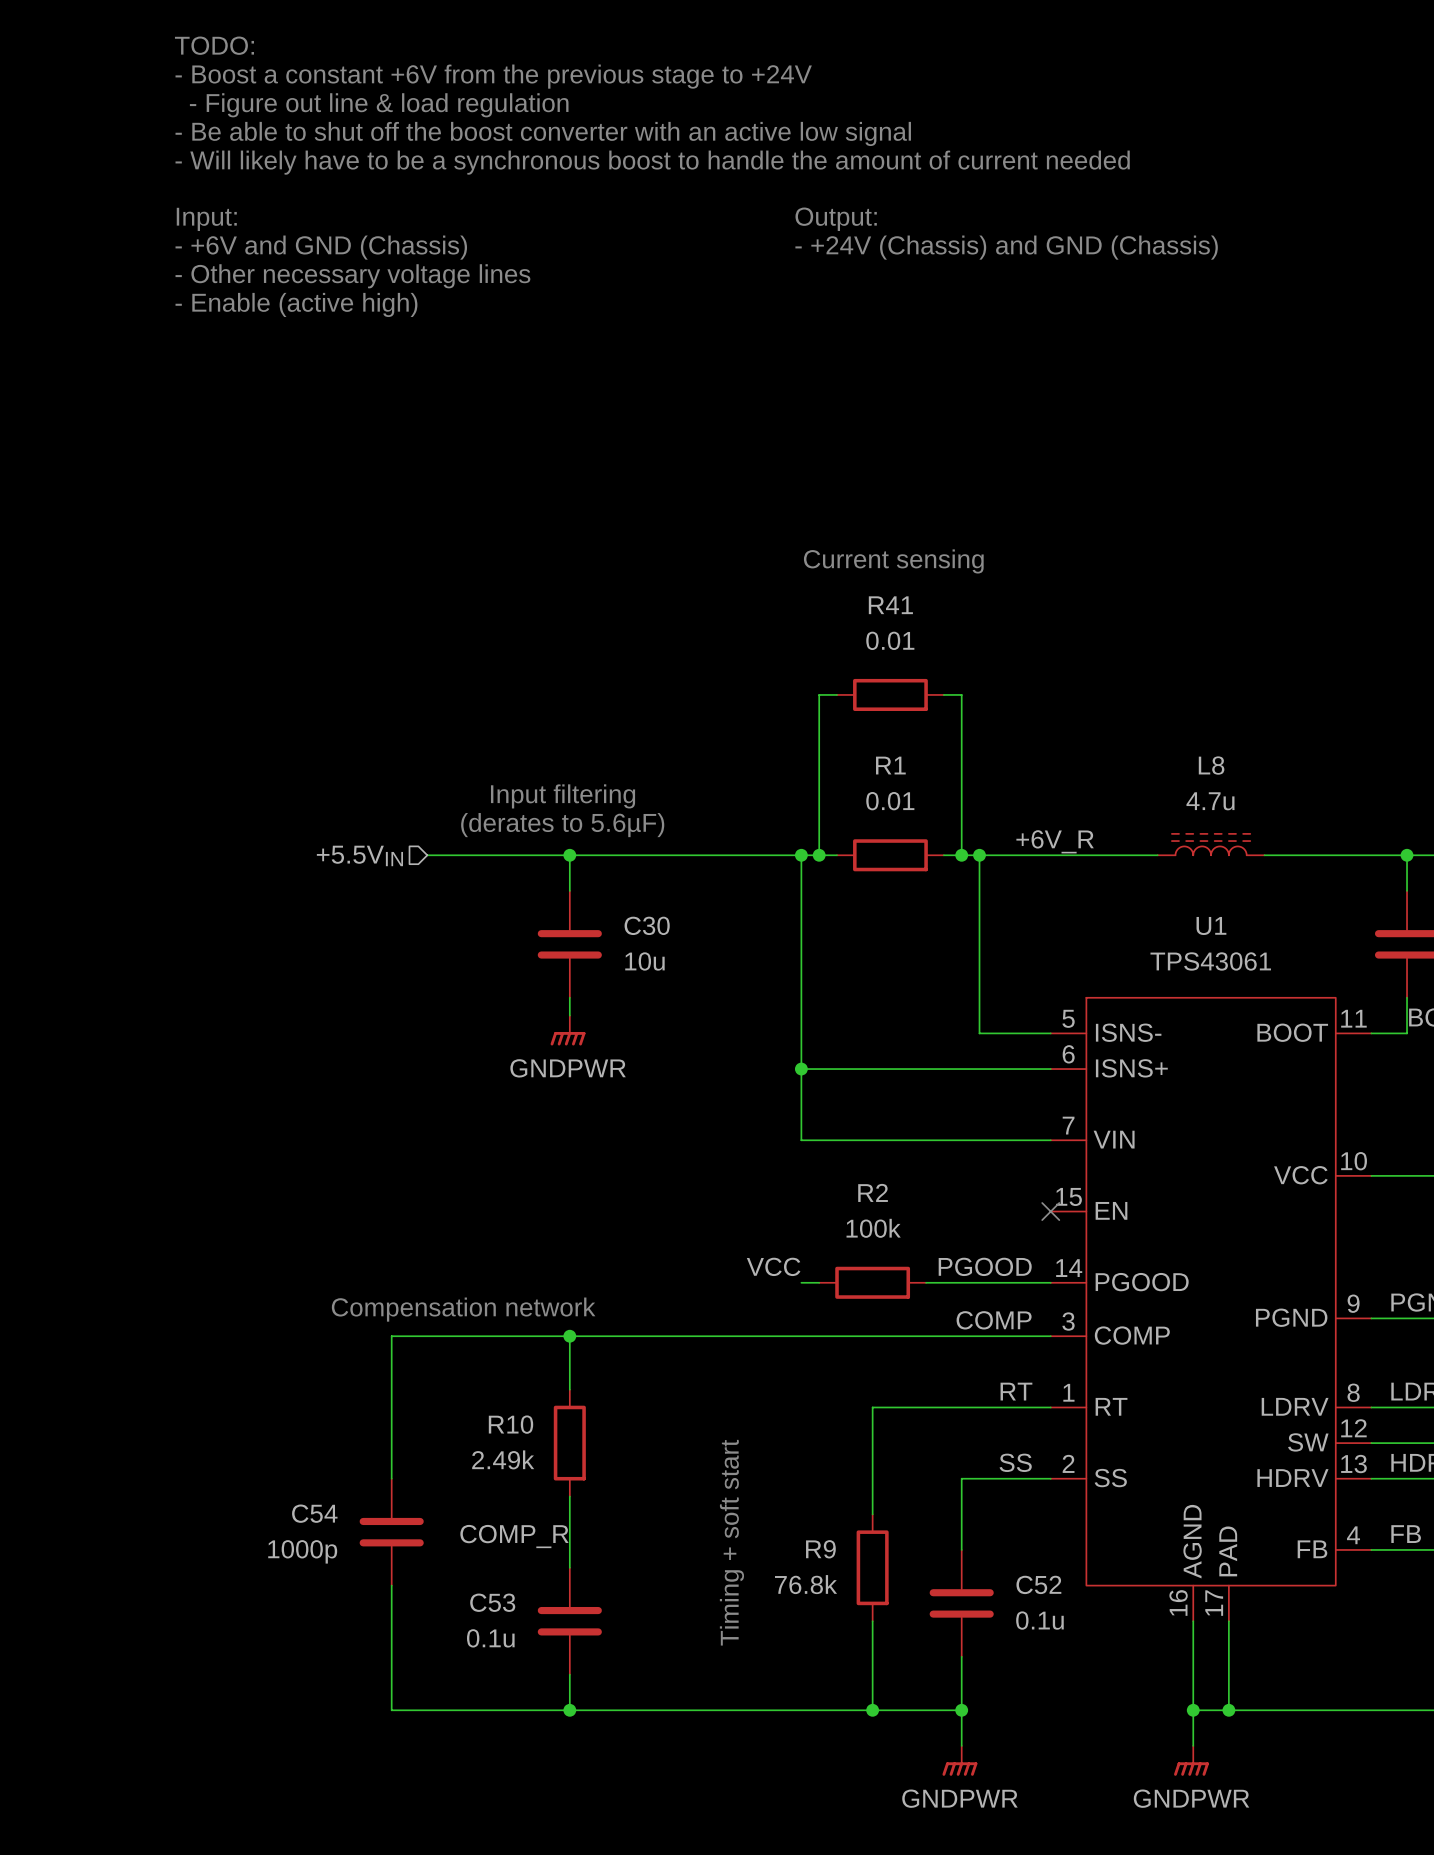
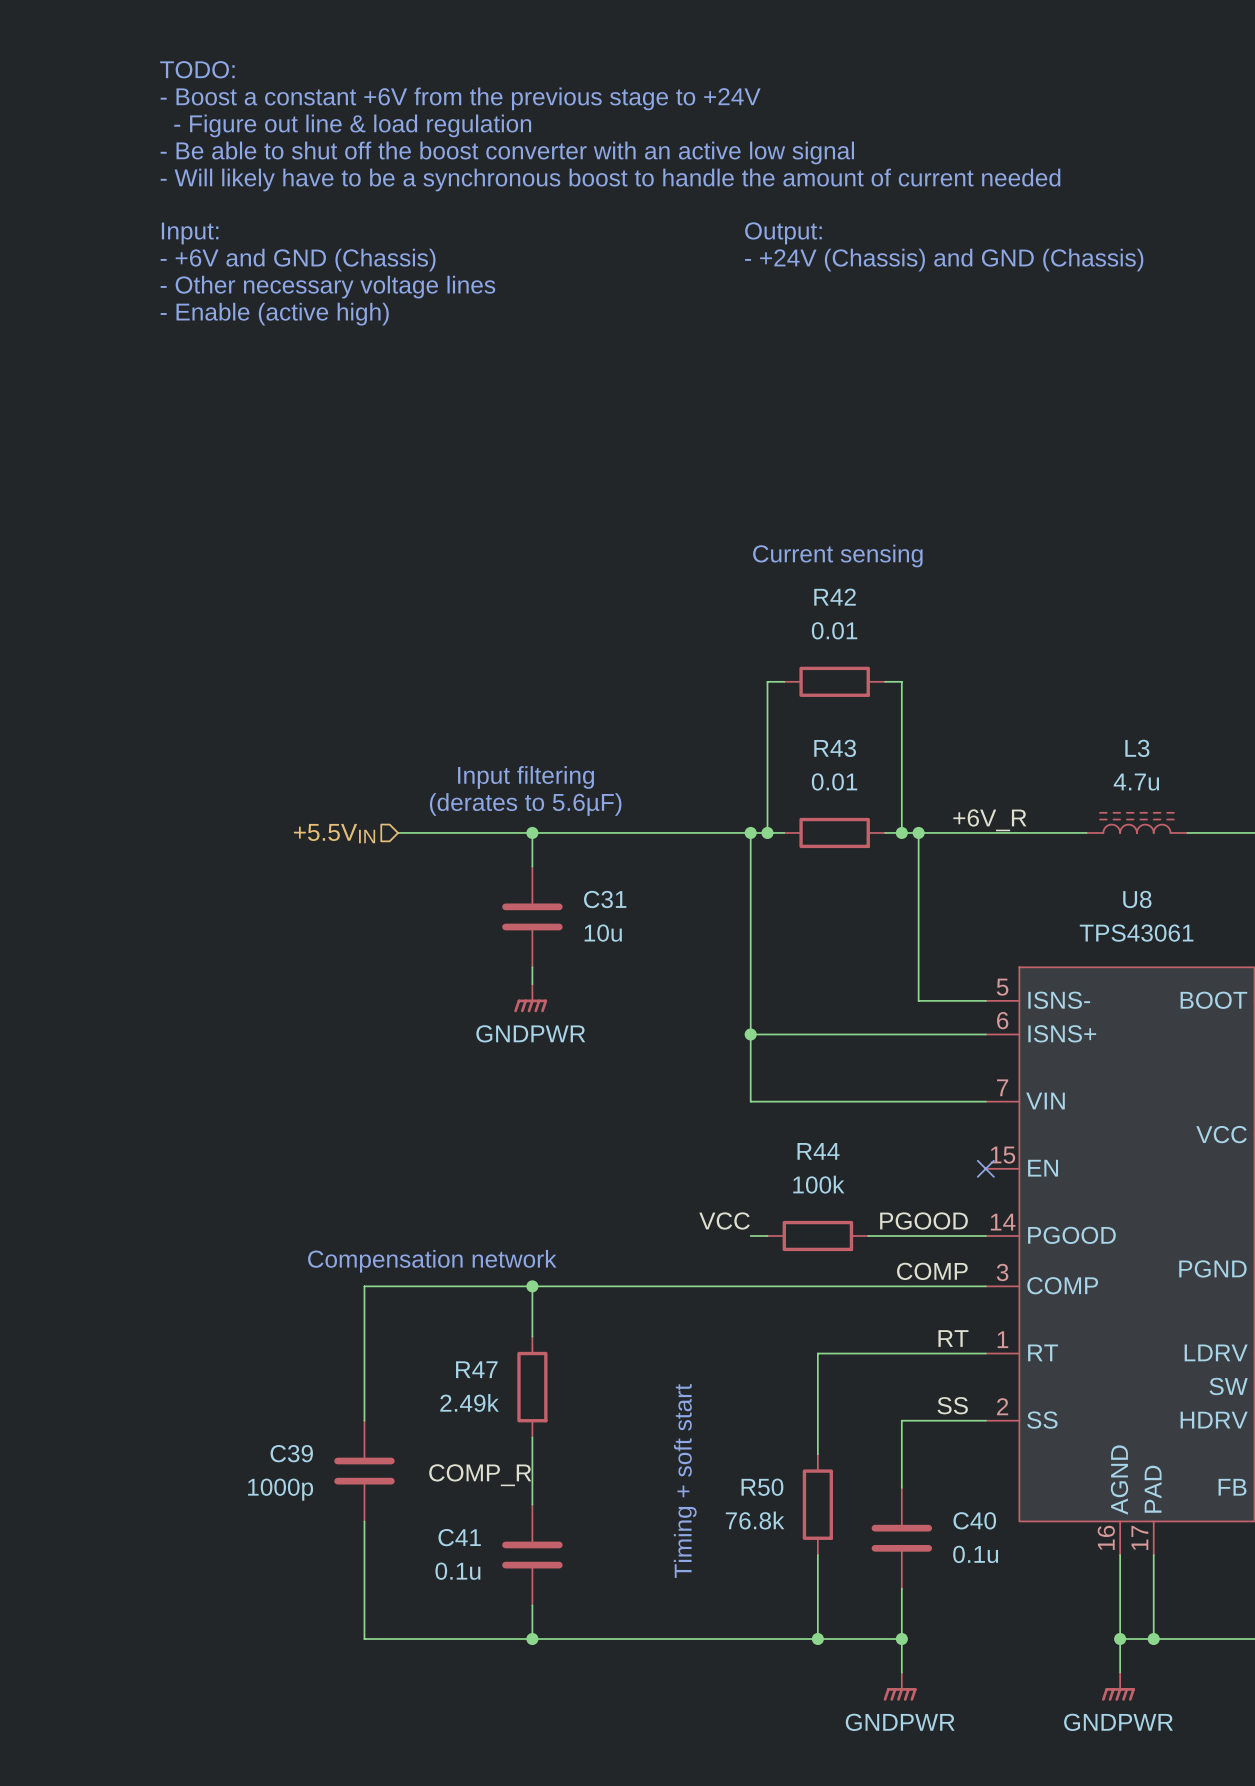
R41 name: R41 (890, 605) -> R42 (835, 597)
R1 name: R1 (890, 765) -> R43 (835, 748)
L8 name: L8 (1211, 765) -> L3 (1137, 748)
C30 name: C30 (647, 925) -> C31 (605, 899)
U1 name: U1 (1211, 925) -> U8 (1137, 899)
R2 name: R2 (873, 1192) -> R44 (818, 1151)
R10 name: R10 (511, 1424) -> R47 (476, 1369)
C54 name: C54 (314, 1513) -> C39 (291, 1453)
R9 name: R9 (820, 1549) -> R50 (762, 1487)
C52 name: C52 (1038, 1584) -> C40 (974, 1520)
C53 name: C53 (492, 1602) -> C41 (459, 1537)

